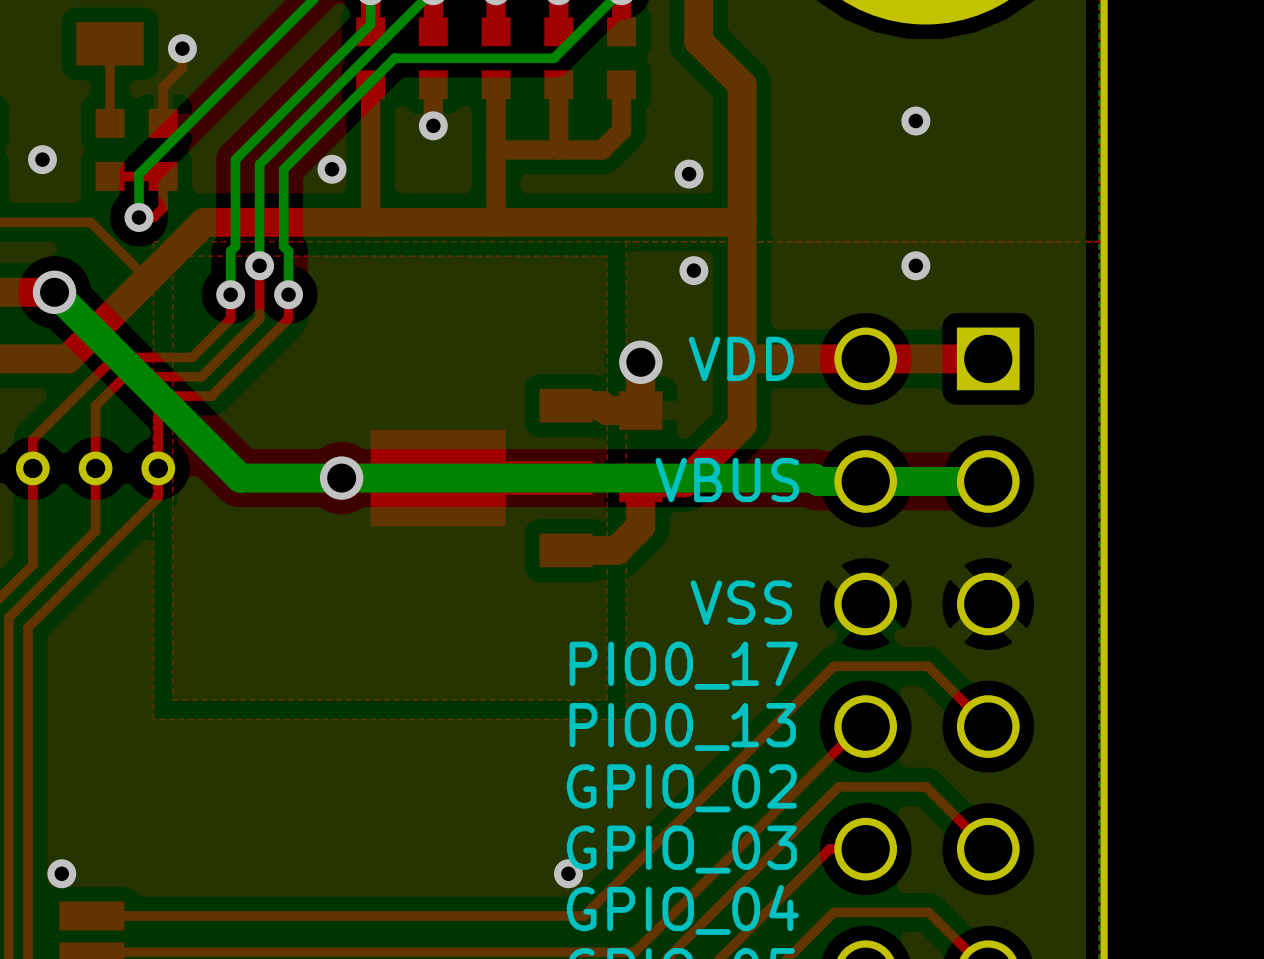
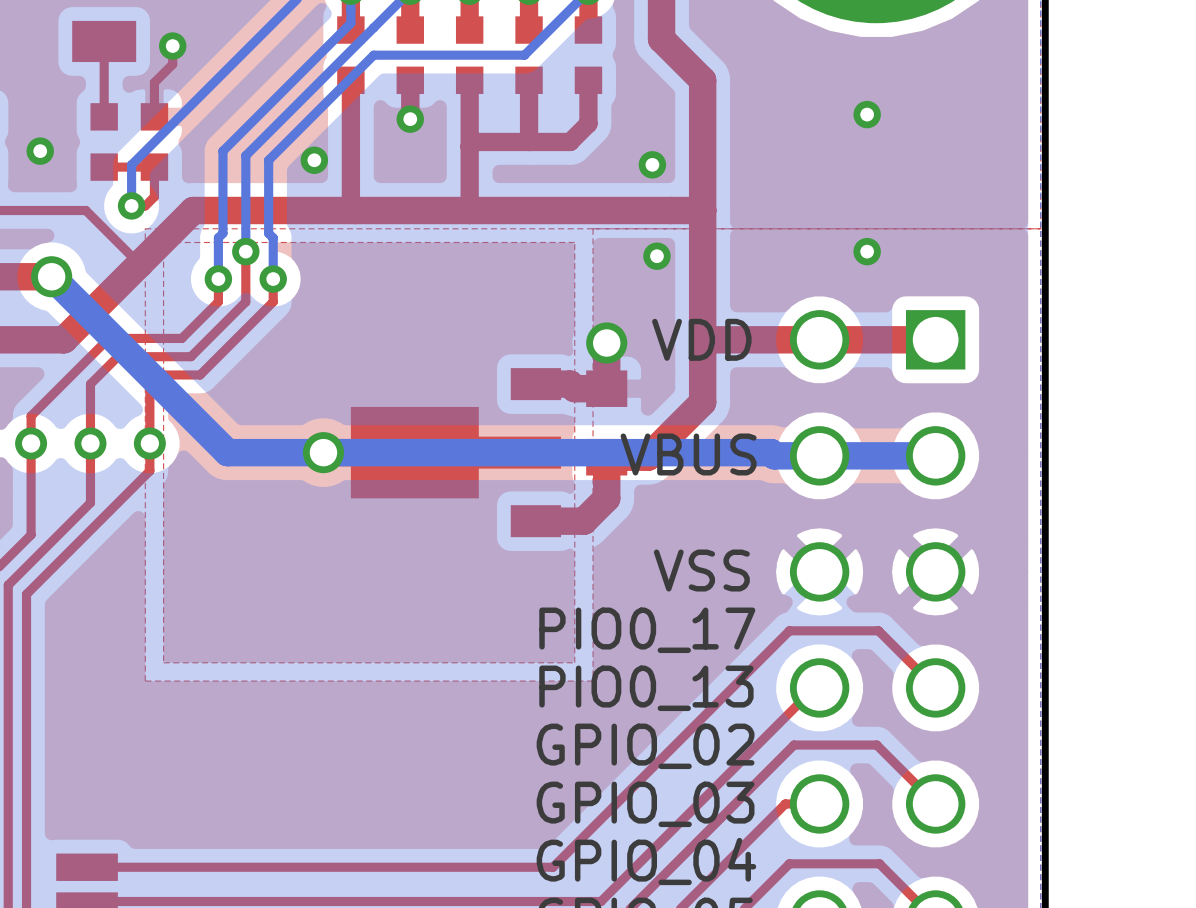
via: (61, 873) -> none
via: (568, 873) -> none

